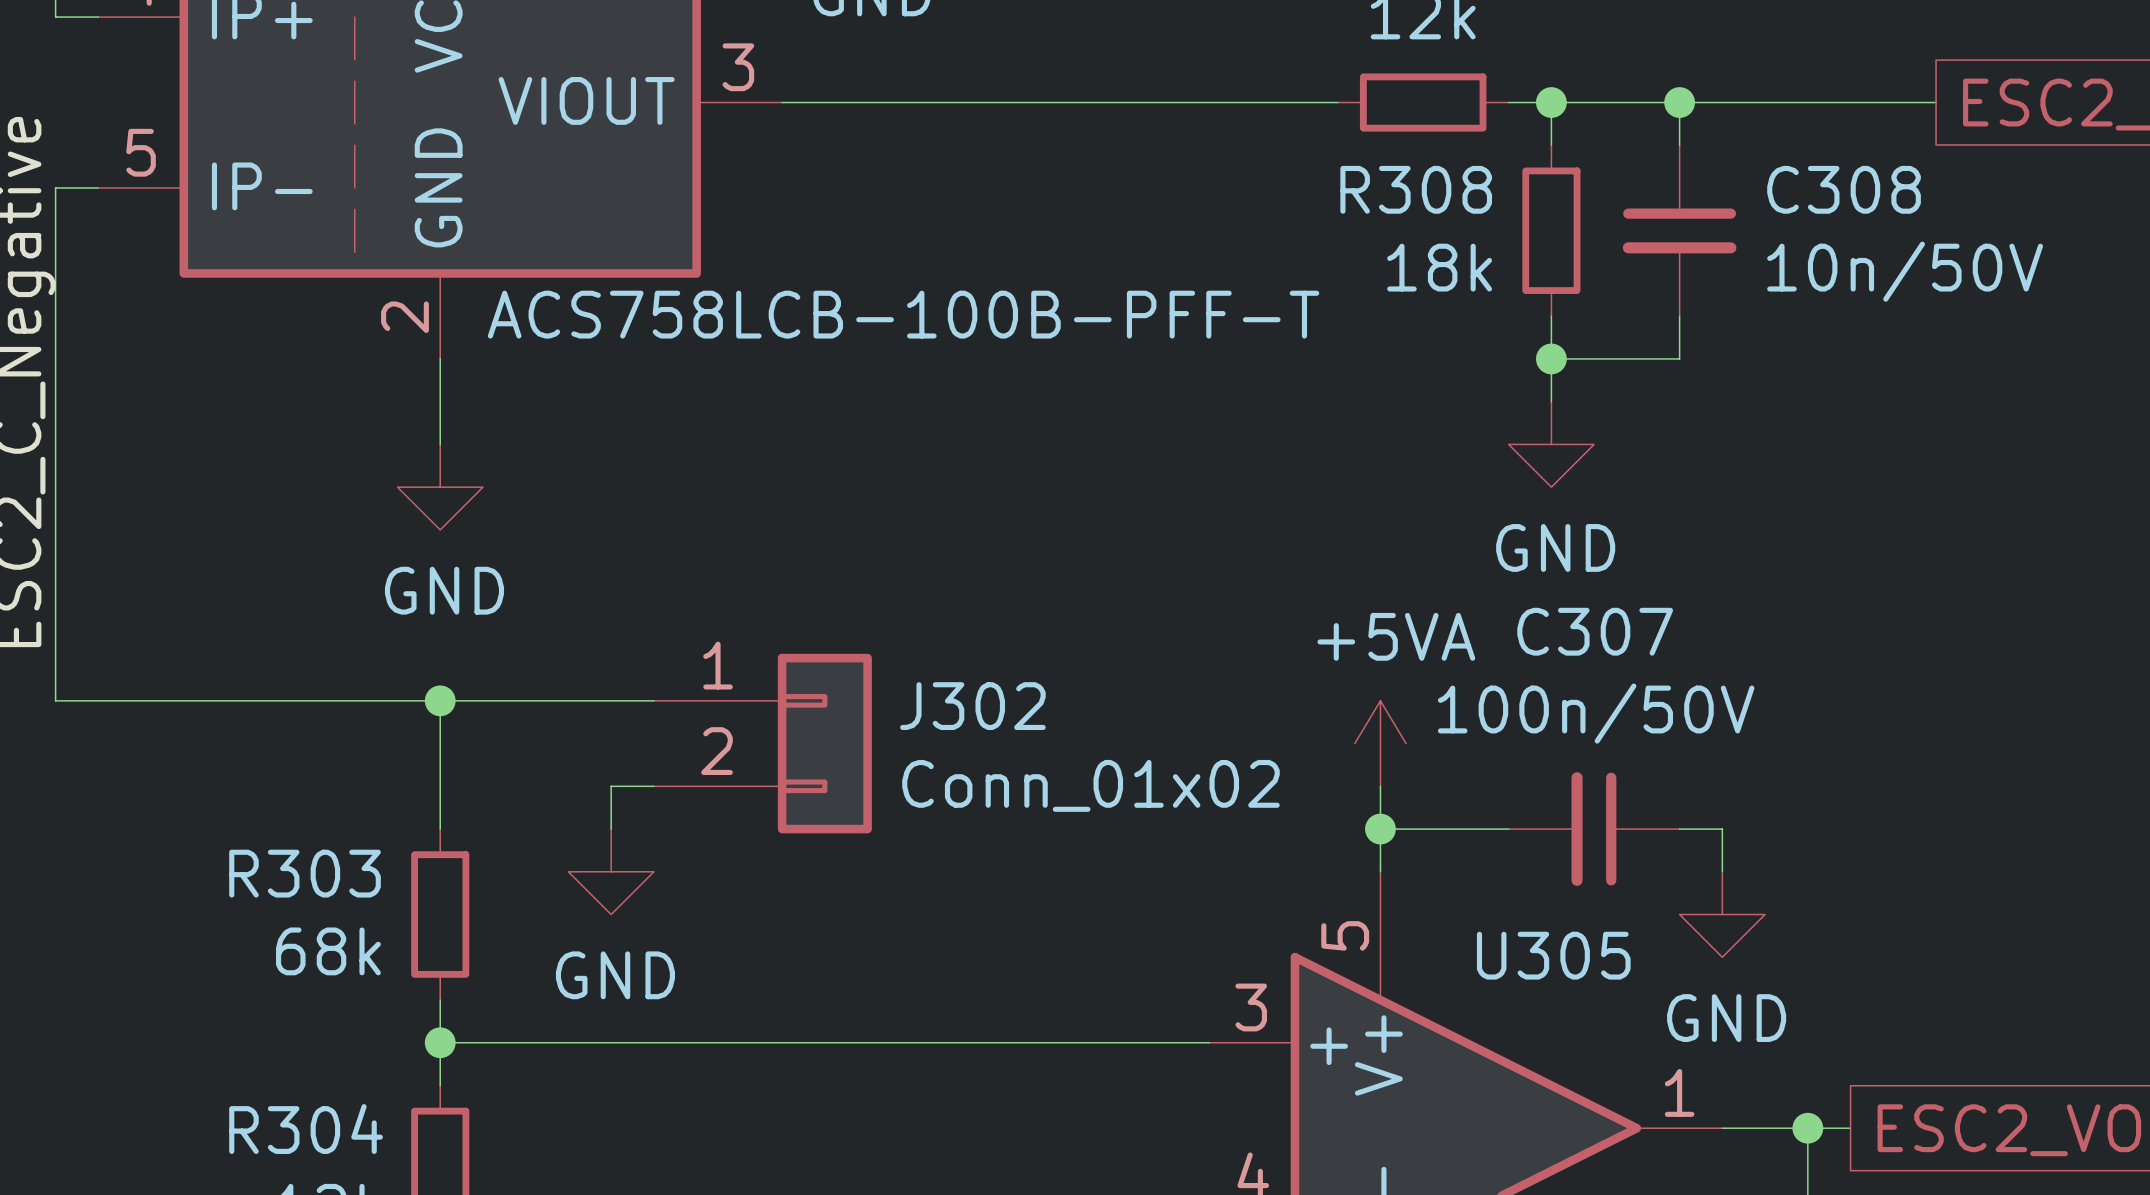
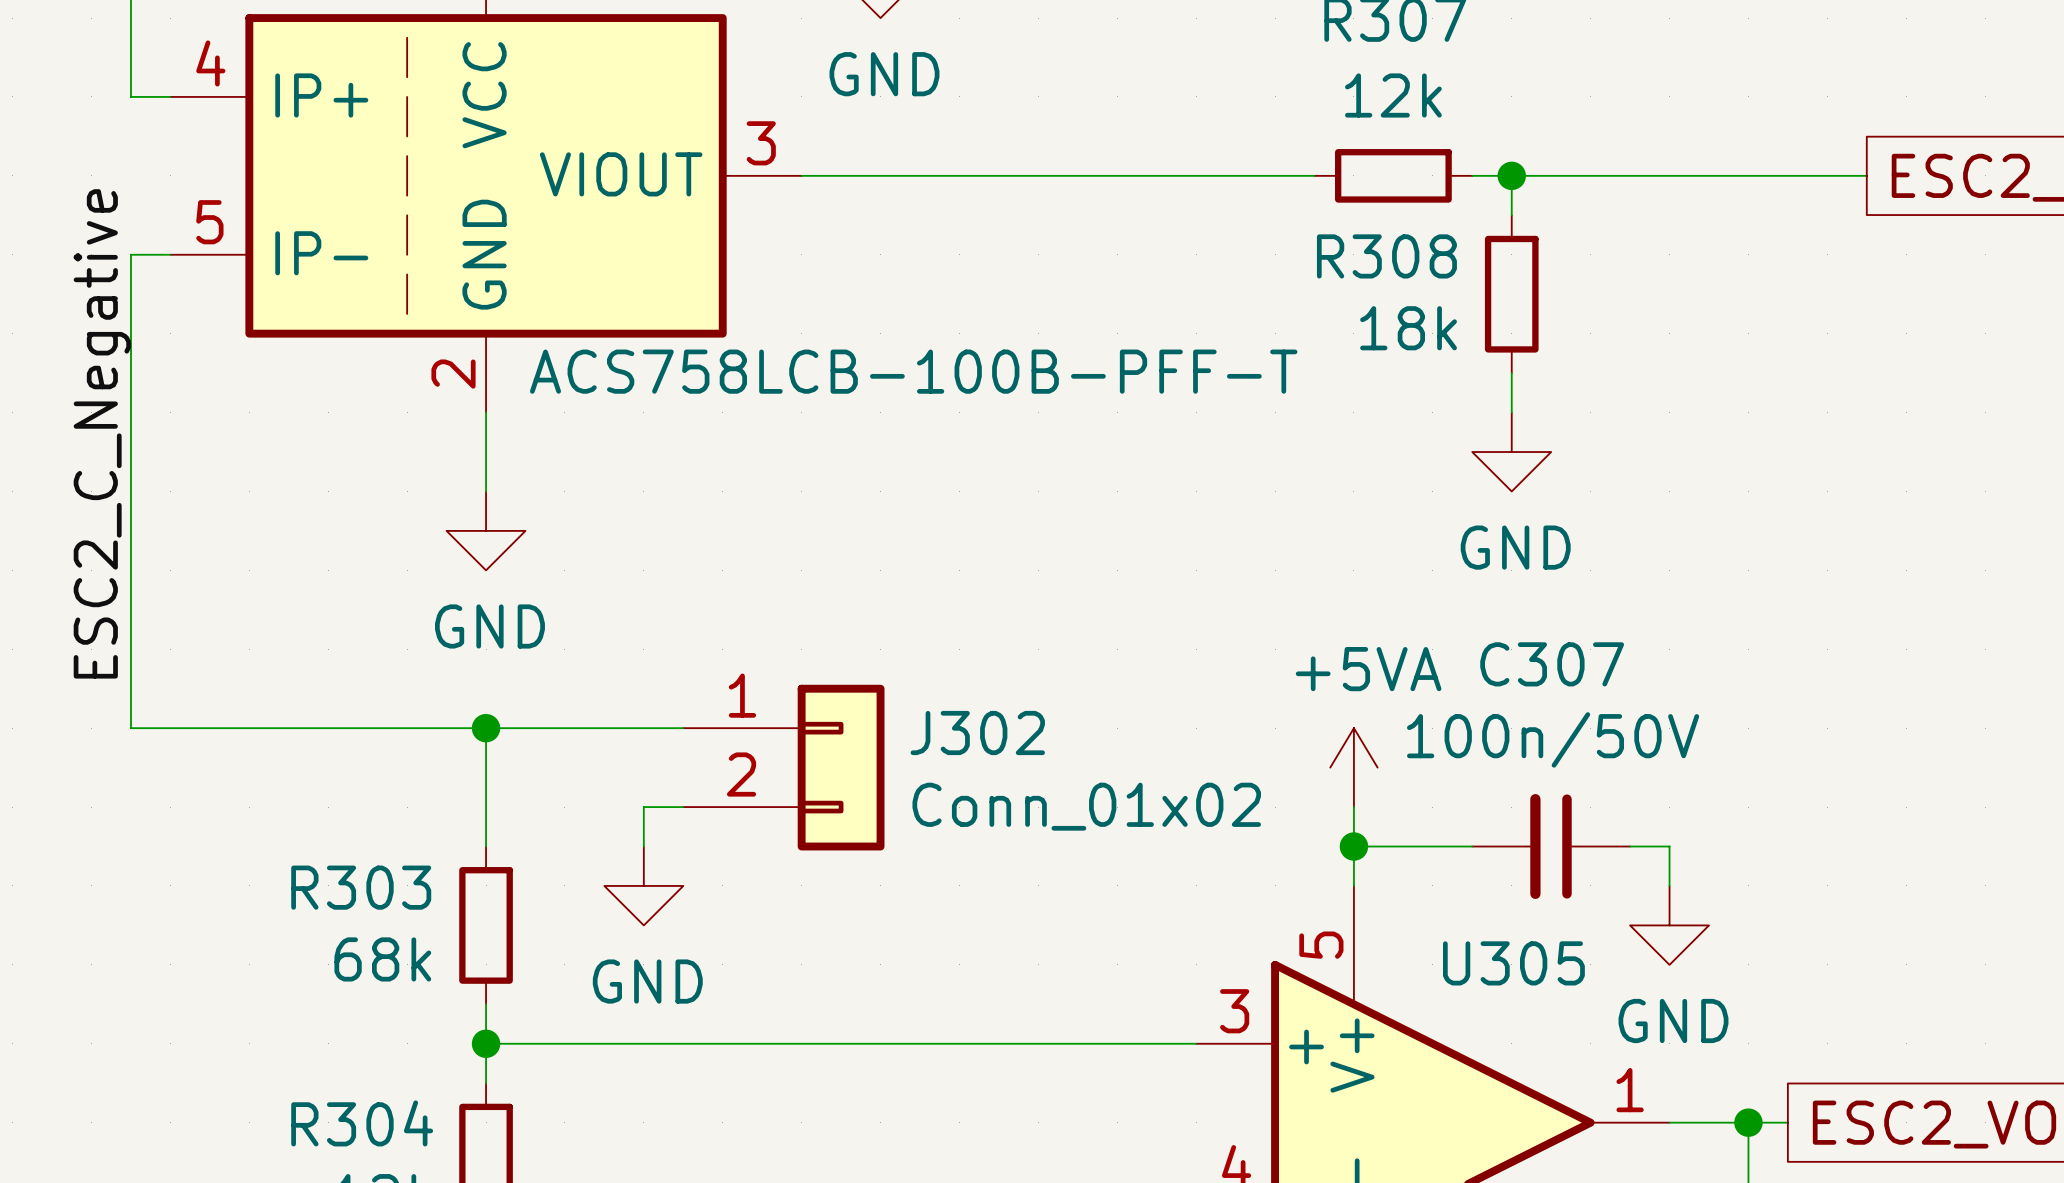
wire: (1679, 102) (1679, 145) -> none
junction: (1679, 102) -> none
C308: 10n/50V (1679, 230) -> none
wire: (1679, 316) (1679, 358) (1551, 358) (1551, 401) -> none
junction: (1551, 358) -> none
power symbol position: GND (1551, 444) -> GND (1511, 452)

